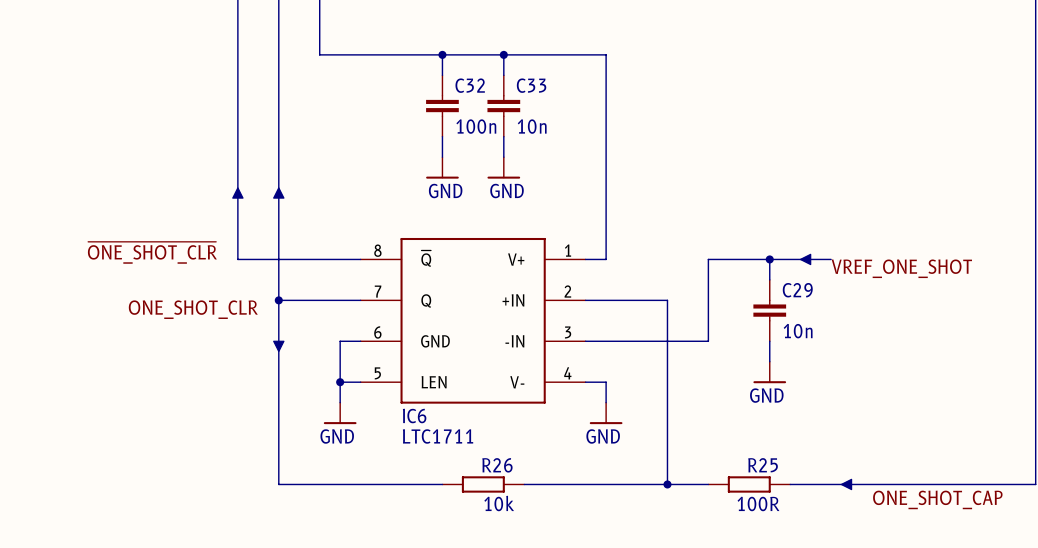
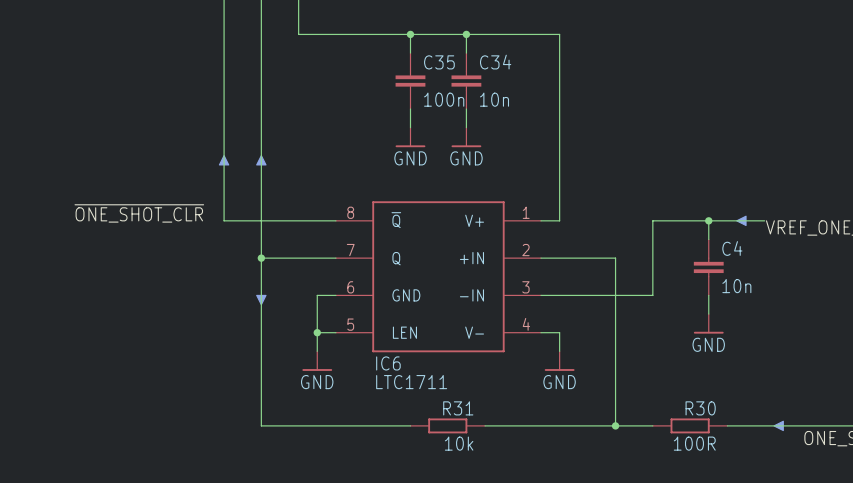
C32 name: C32 (470, 85) -> C35 (439, 62)
C33 name: C33 (531, 85) -> C34 (495, 62)
C29 name: C29 (797, 290) -> C4 (732, 248)
label: ONE_SHOT_CLR (193, 309) -> none
R26 name: R26 (497, 465) -> R31 (458, 408)
R25 name: R25 (763, 465) -> R30 (700, 408)

